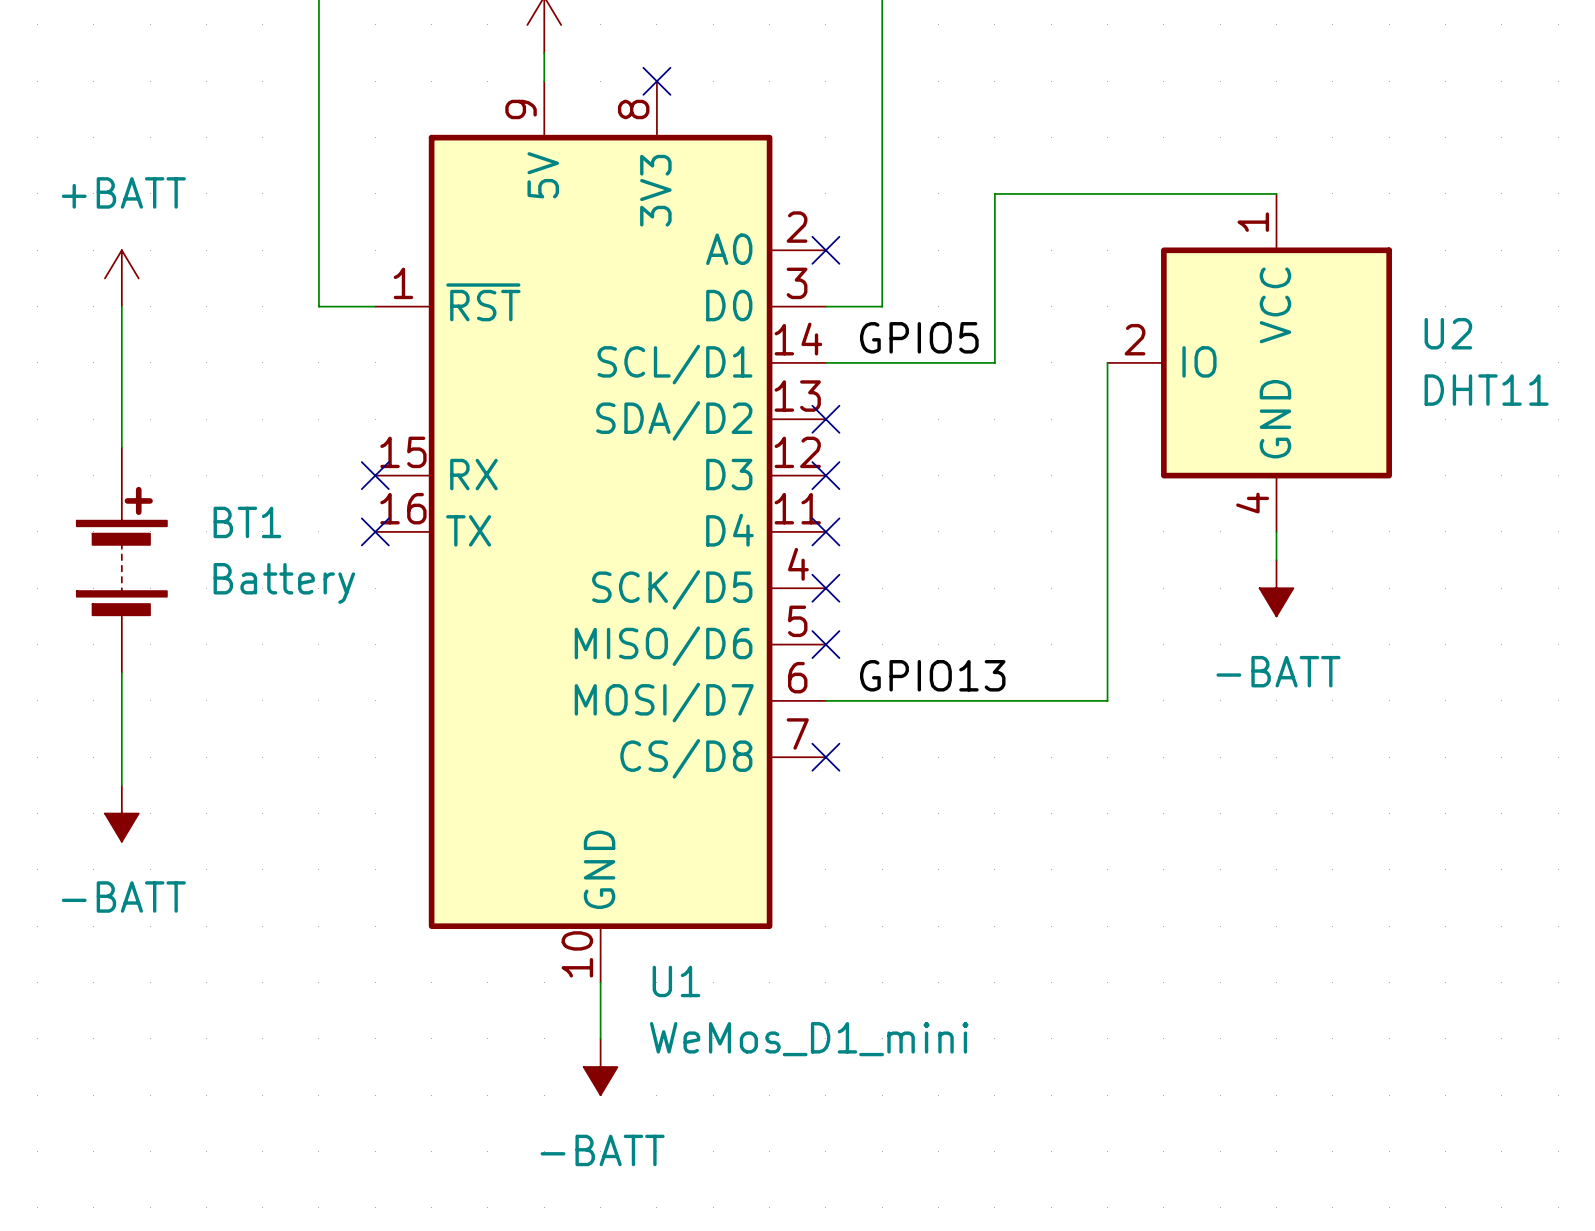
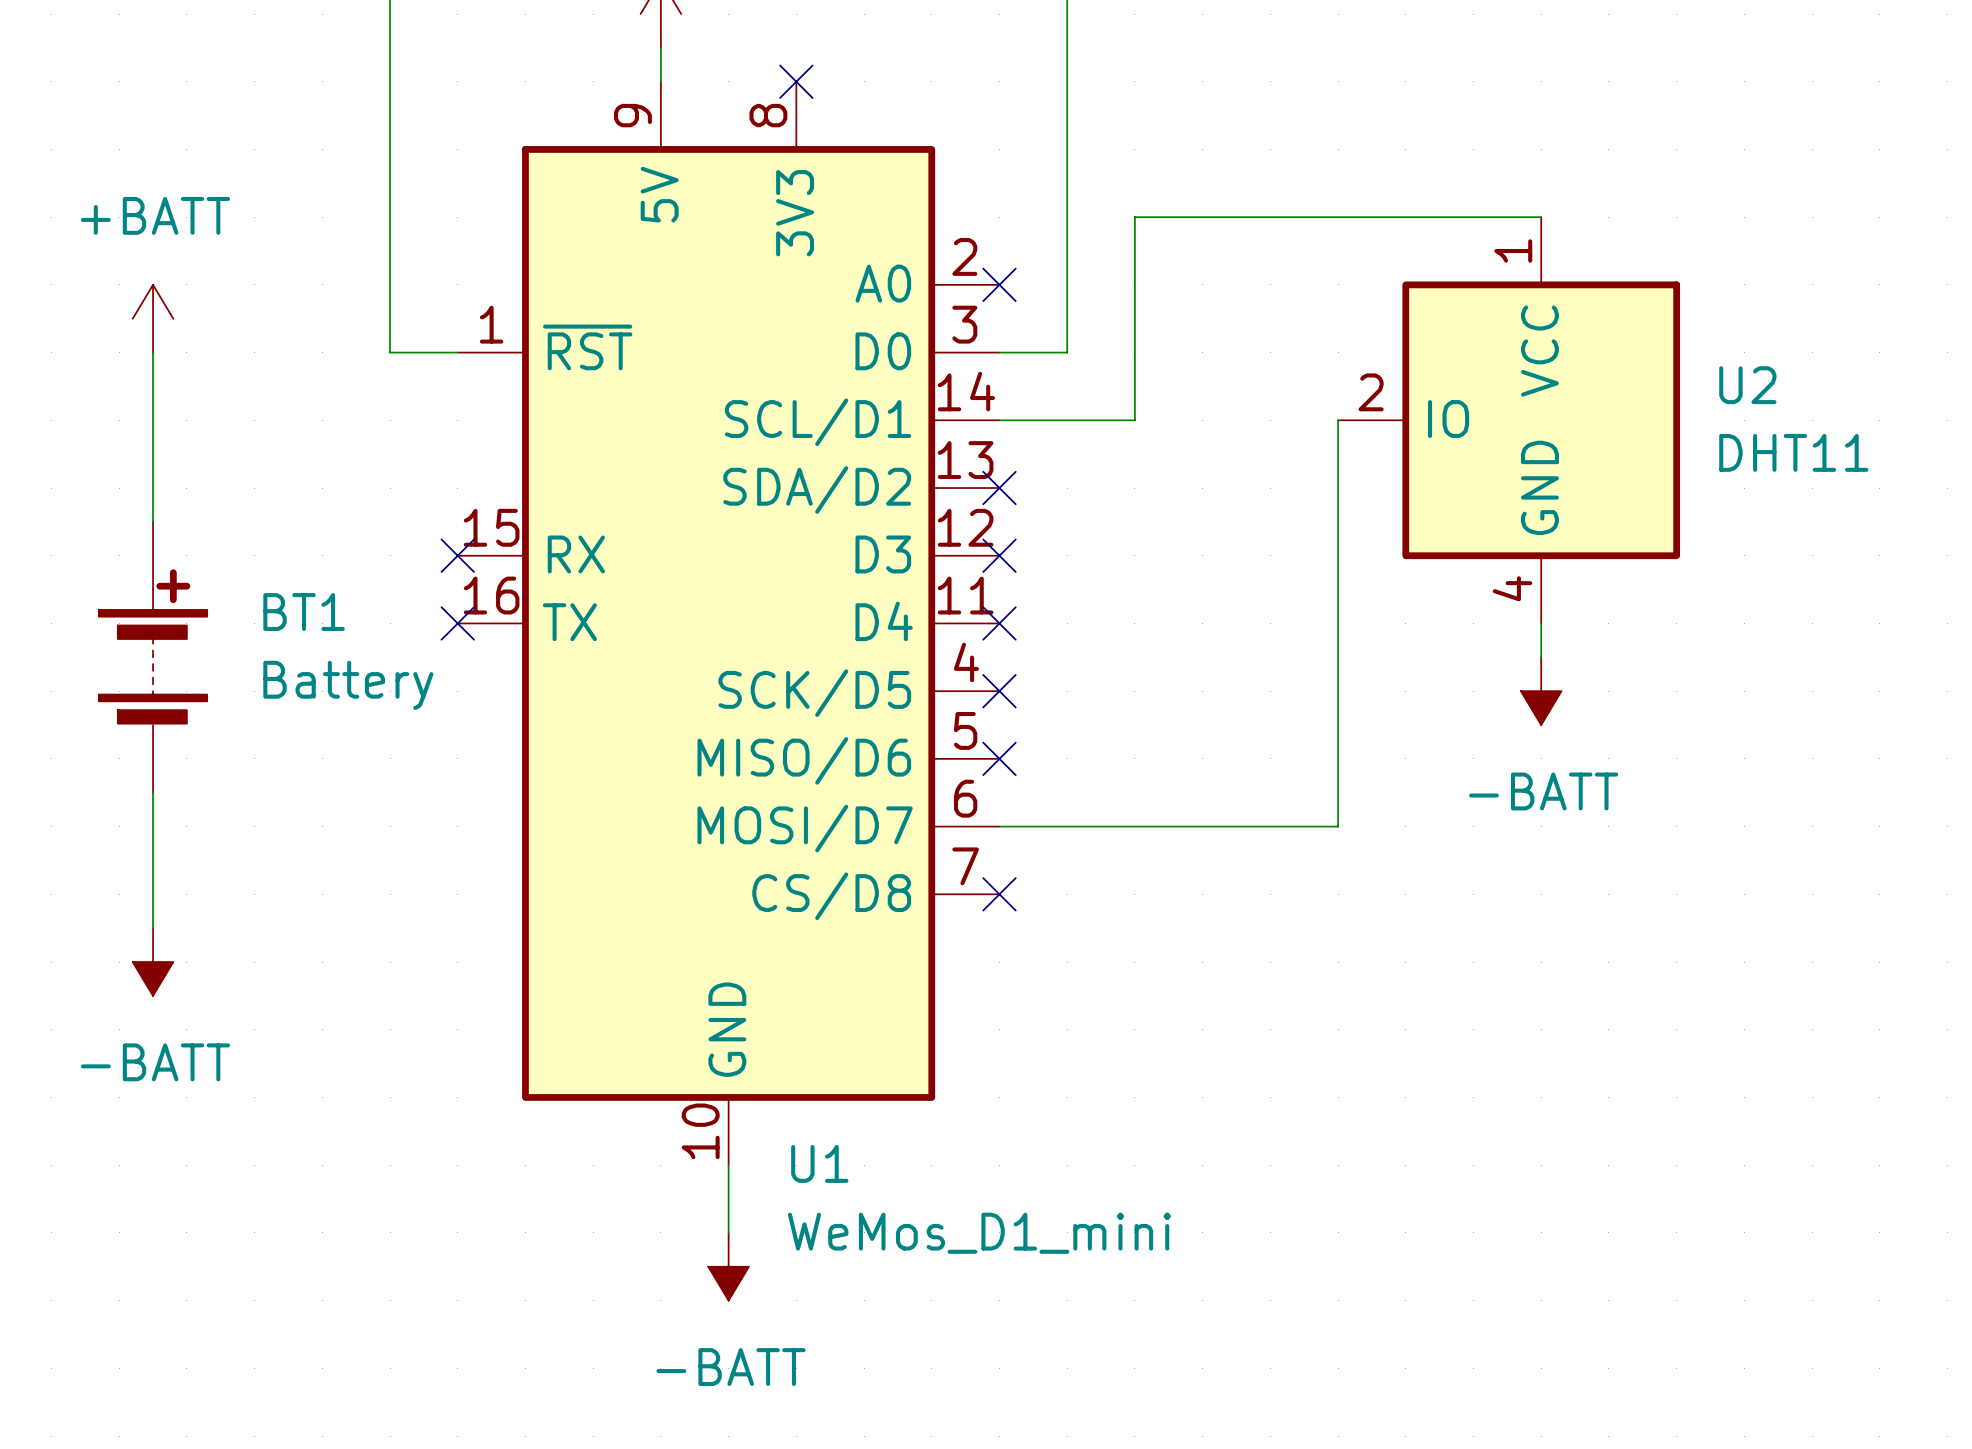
wire: (994, 193) (994, 362) (938, 362) -> (1202, 217) (1134, 217) (1134, 420)
label: GPIO5 (919, 337) -> none
label: GPIO13 (932, 675) -> none

